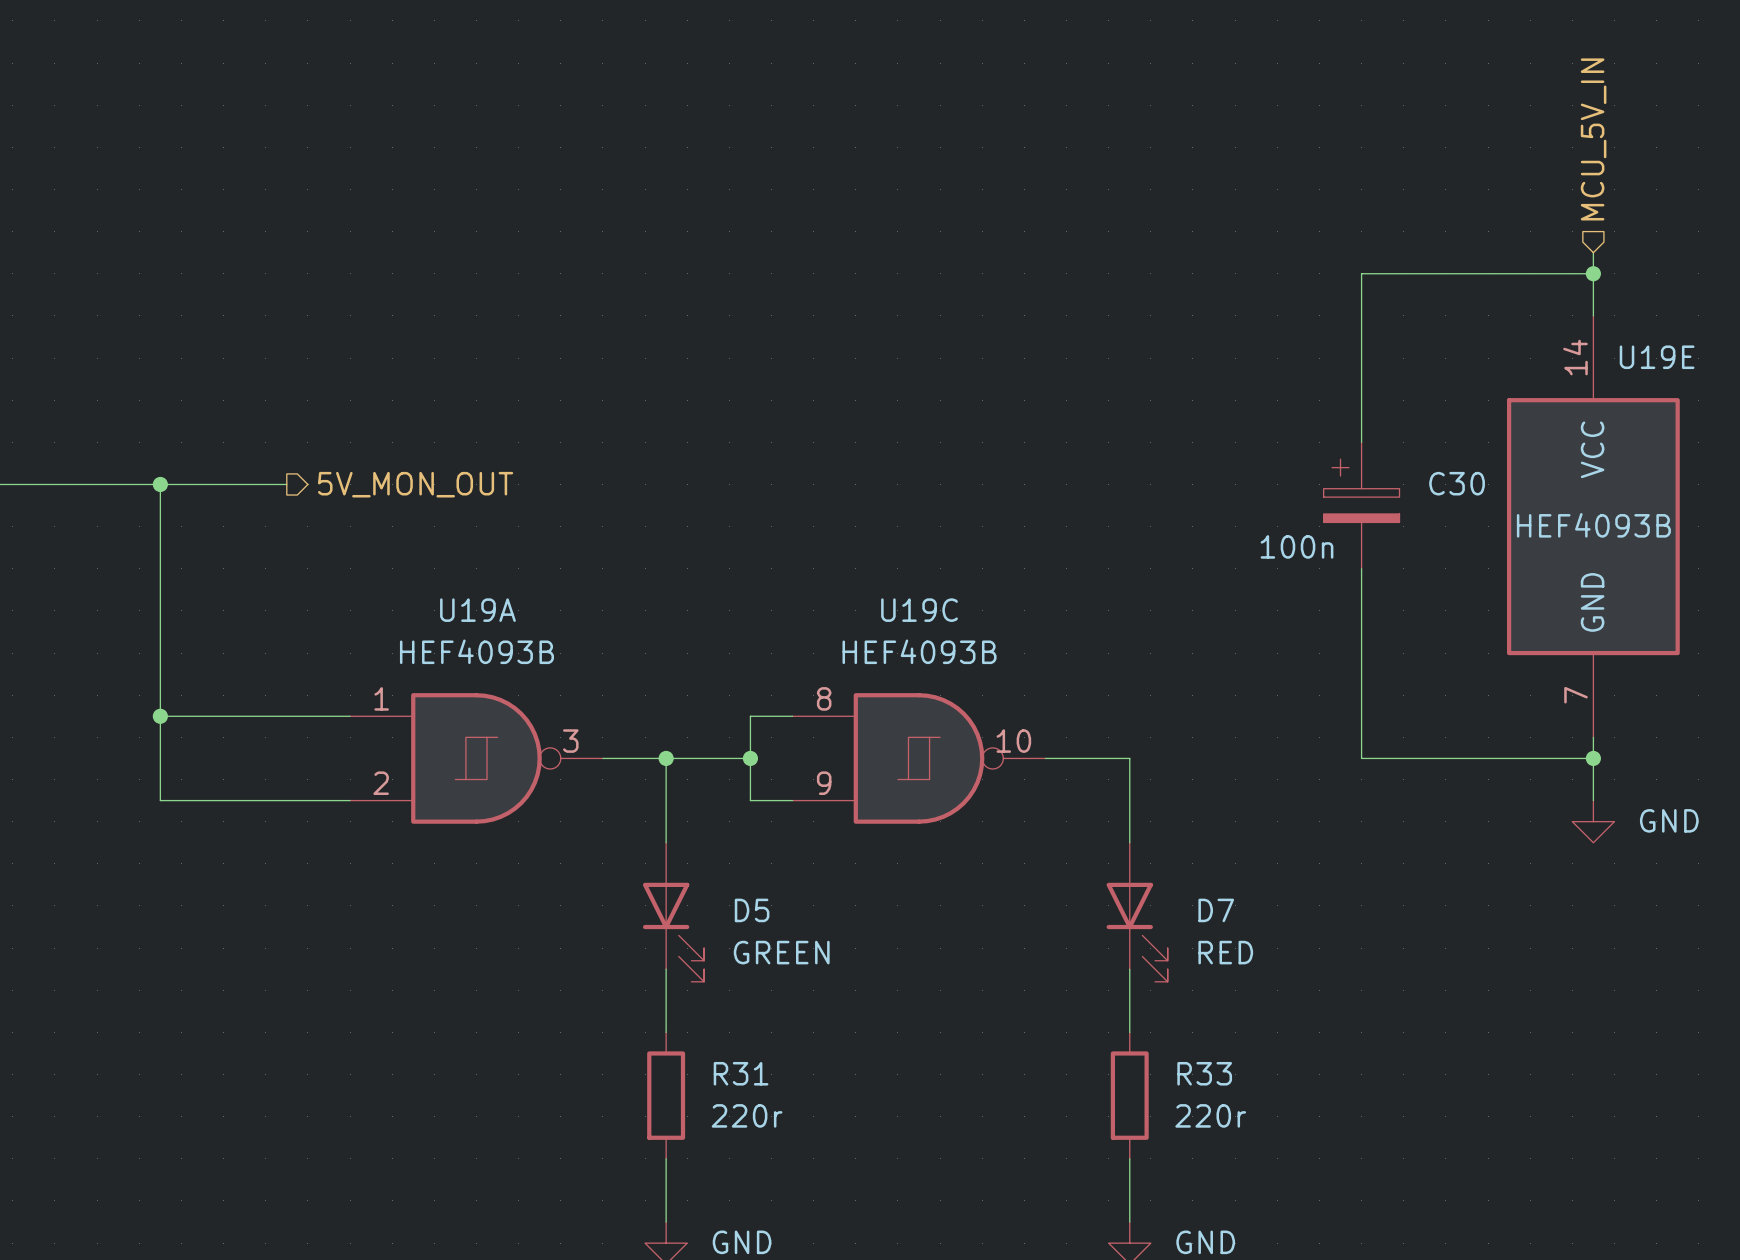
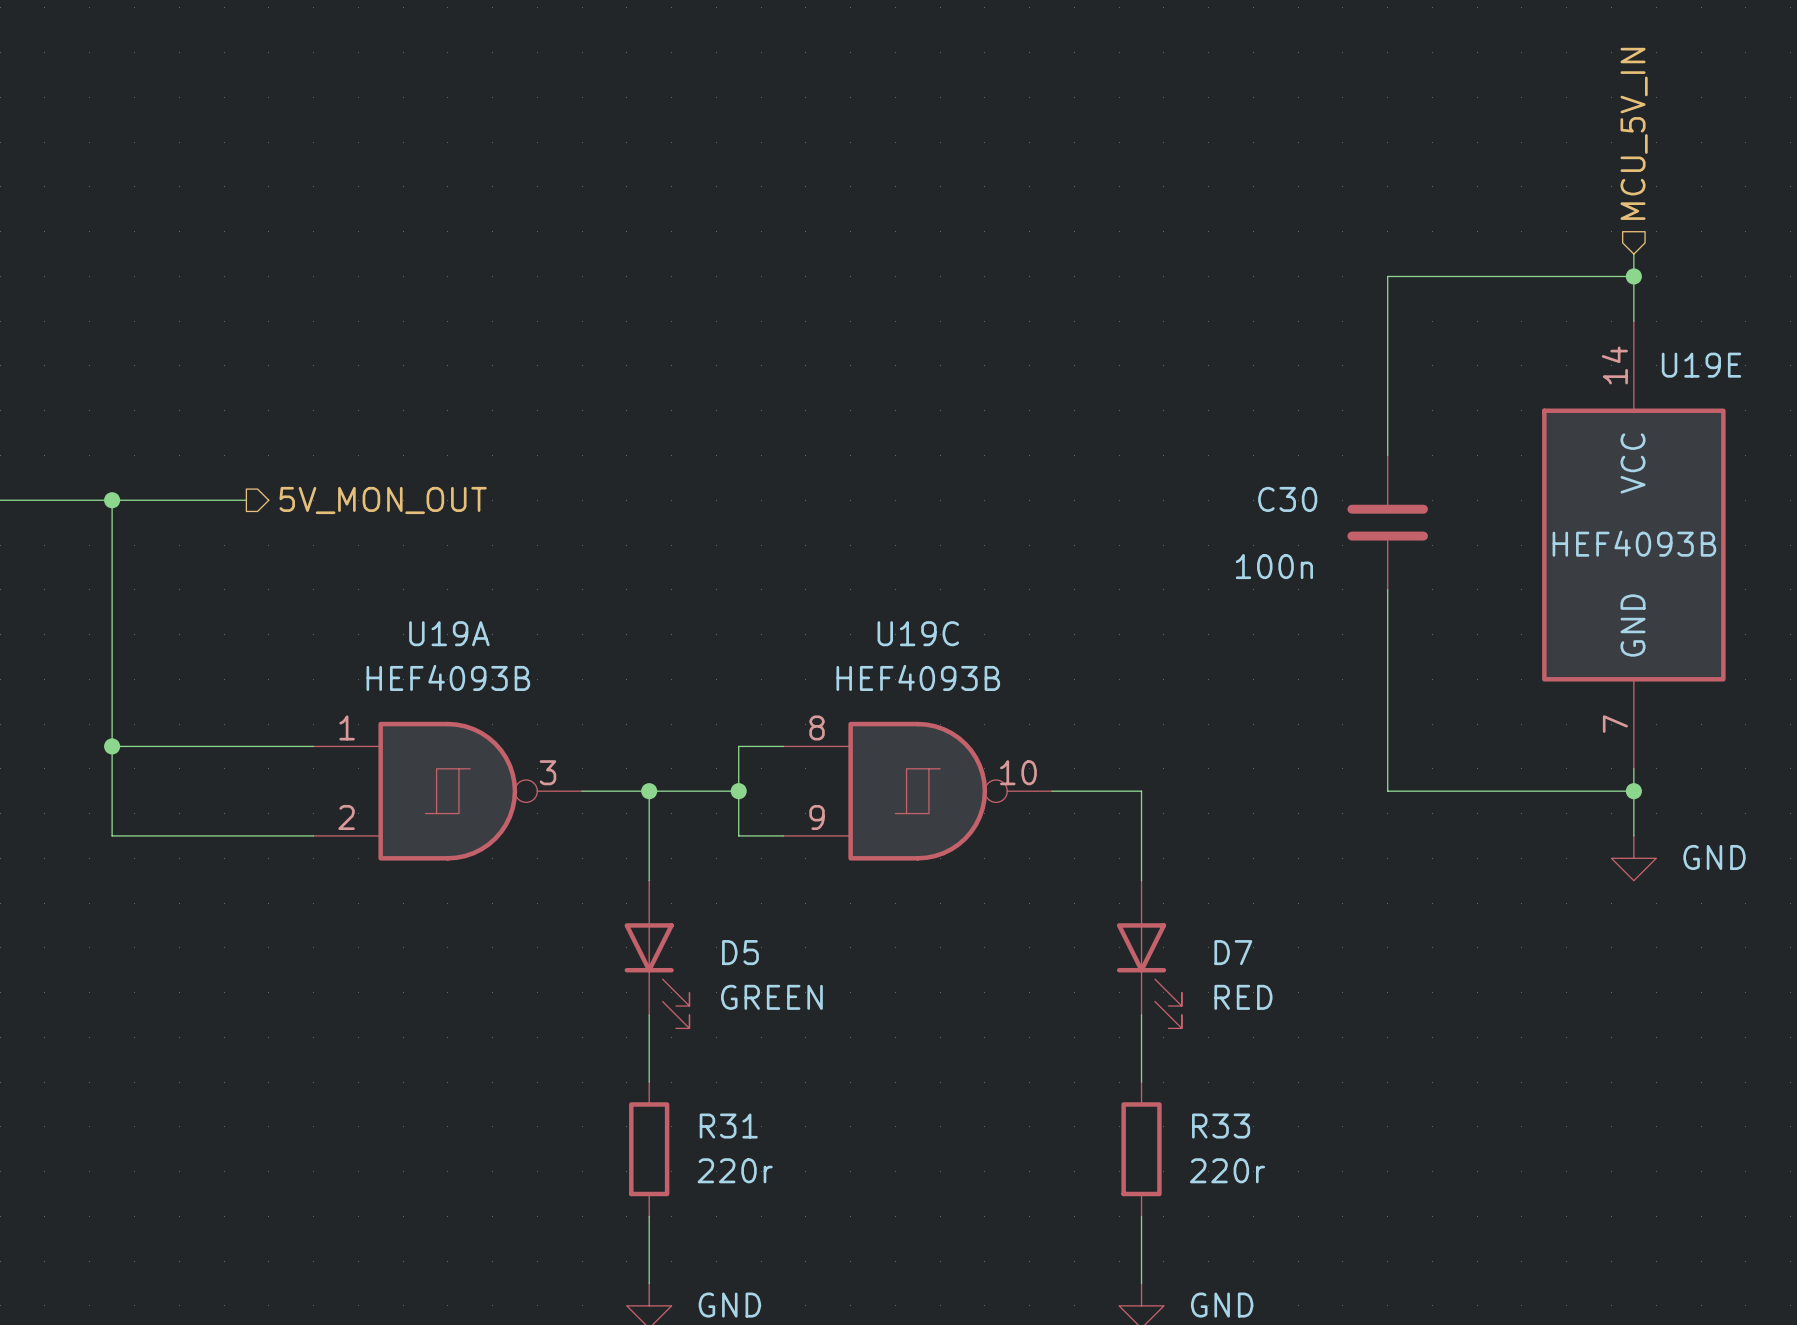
C30 symbol: [1323, 442, 1400, 569] -> [1347, 455, 1428, 590]
C30 name position: C30 (1457, 483) -> C30 (1287, 499)
C30 value position: 100n (1297, 546) -> 100n (1274, 566)

